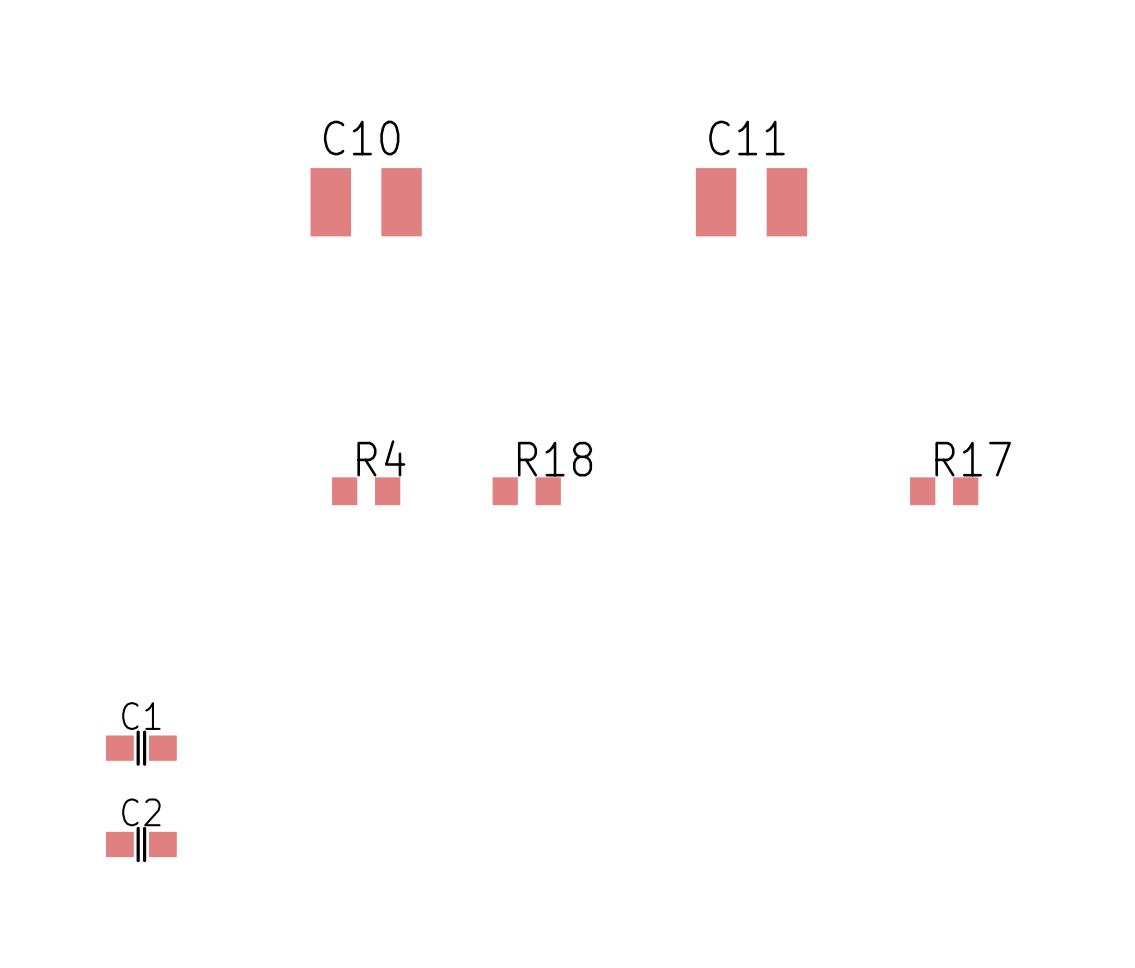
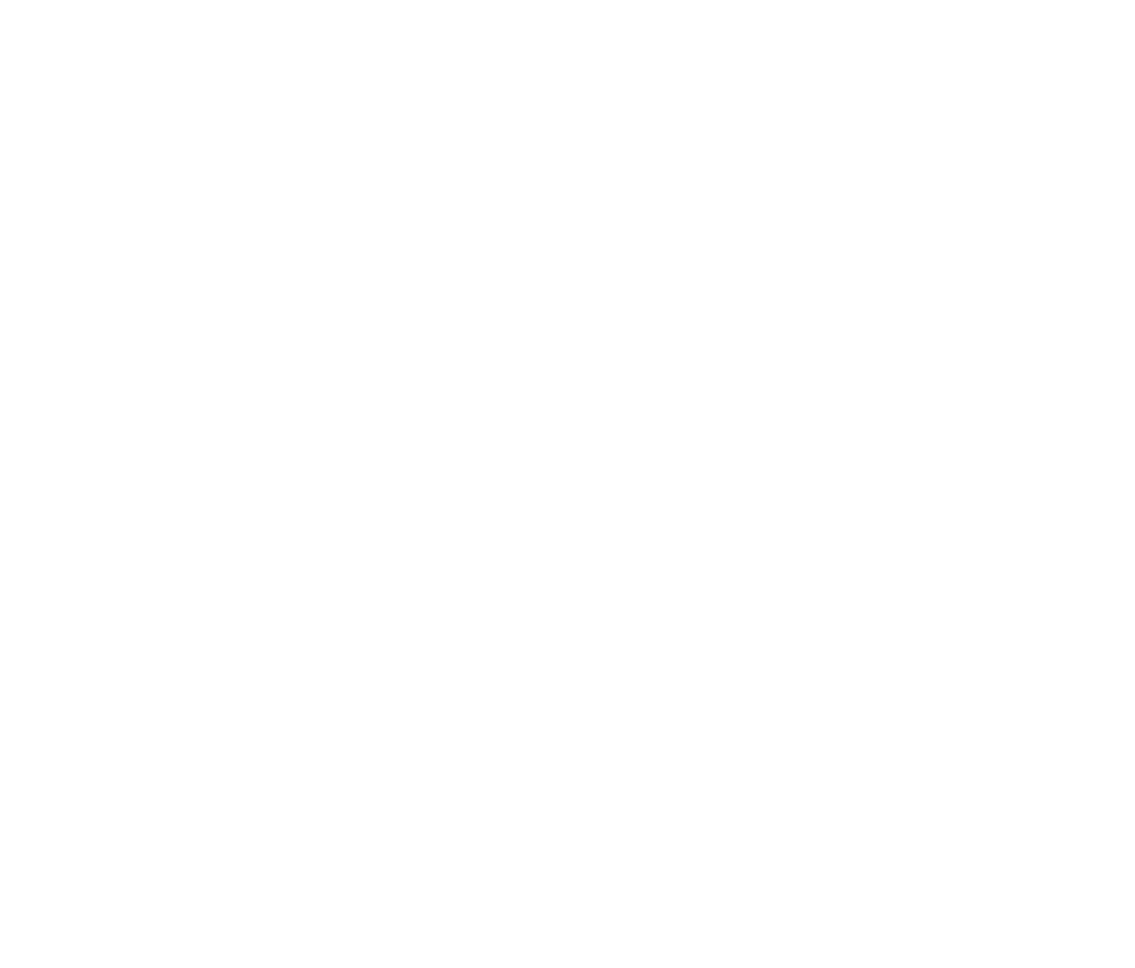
C10: (366, 202) -> none
C11: (751, 202) -> none
R4: (366, 491) -> none
R18: (526, 491) -> none
R17: (944, 491) -> none
C1: (141, 748) -> none
C2: (141, 844) -> none

